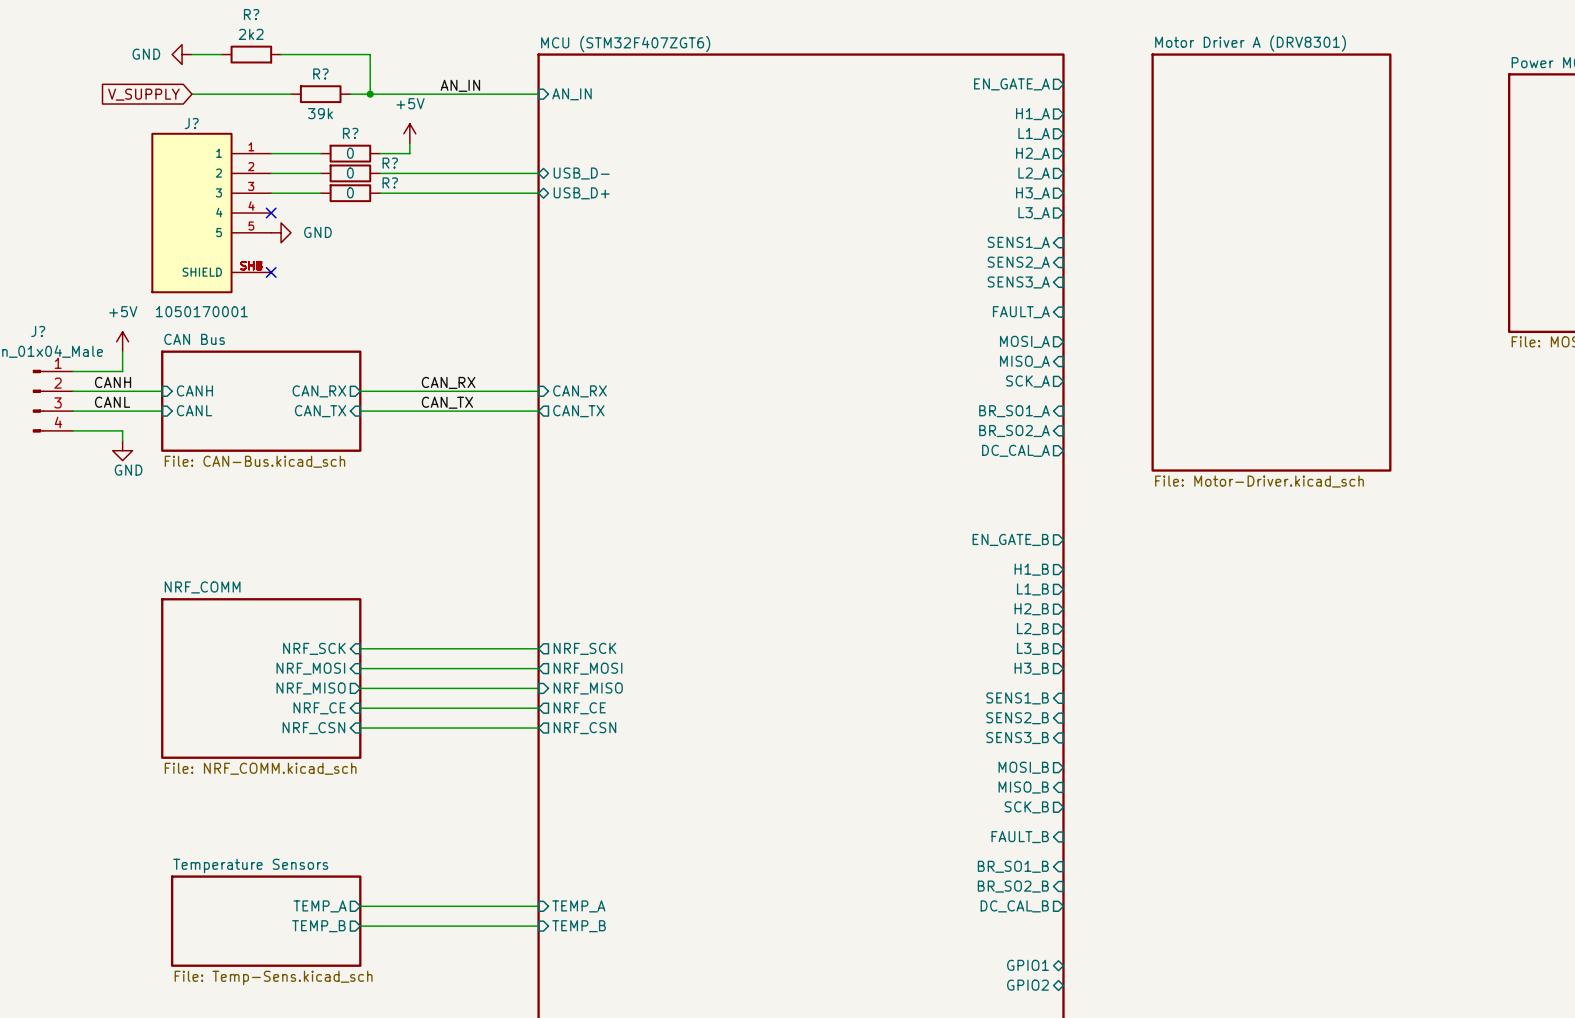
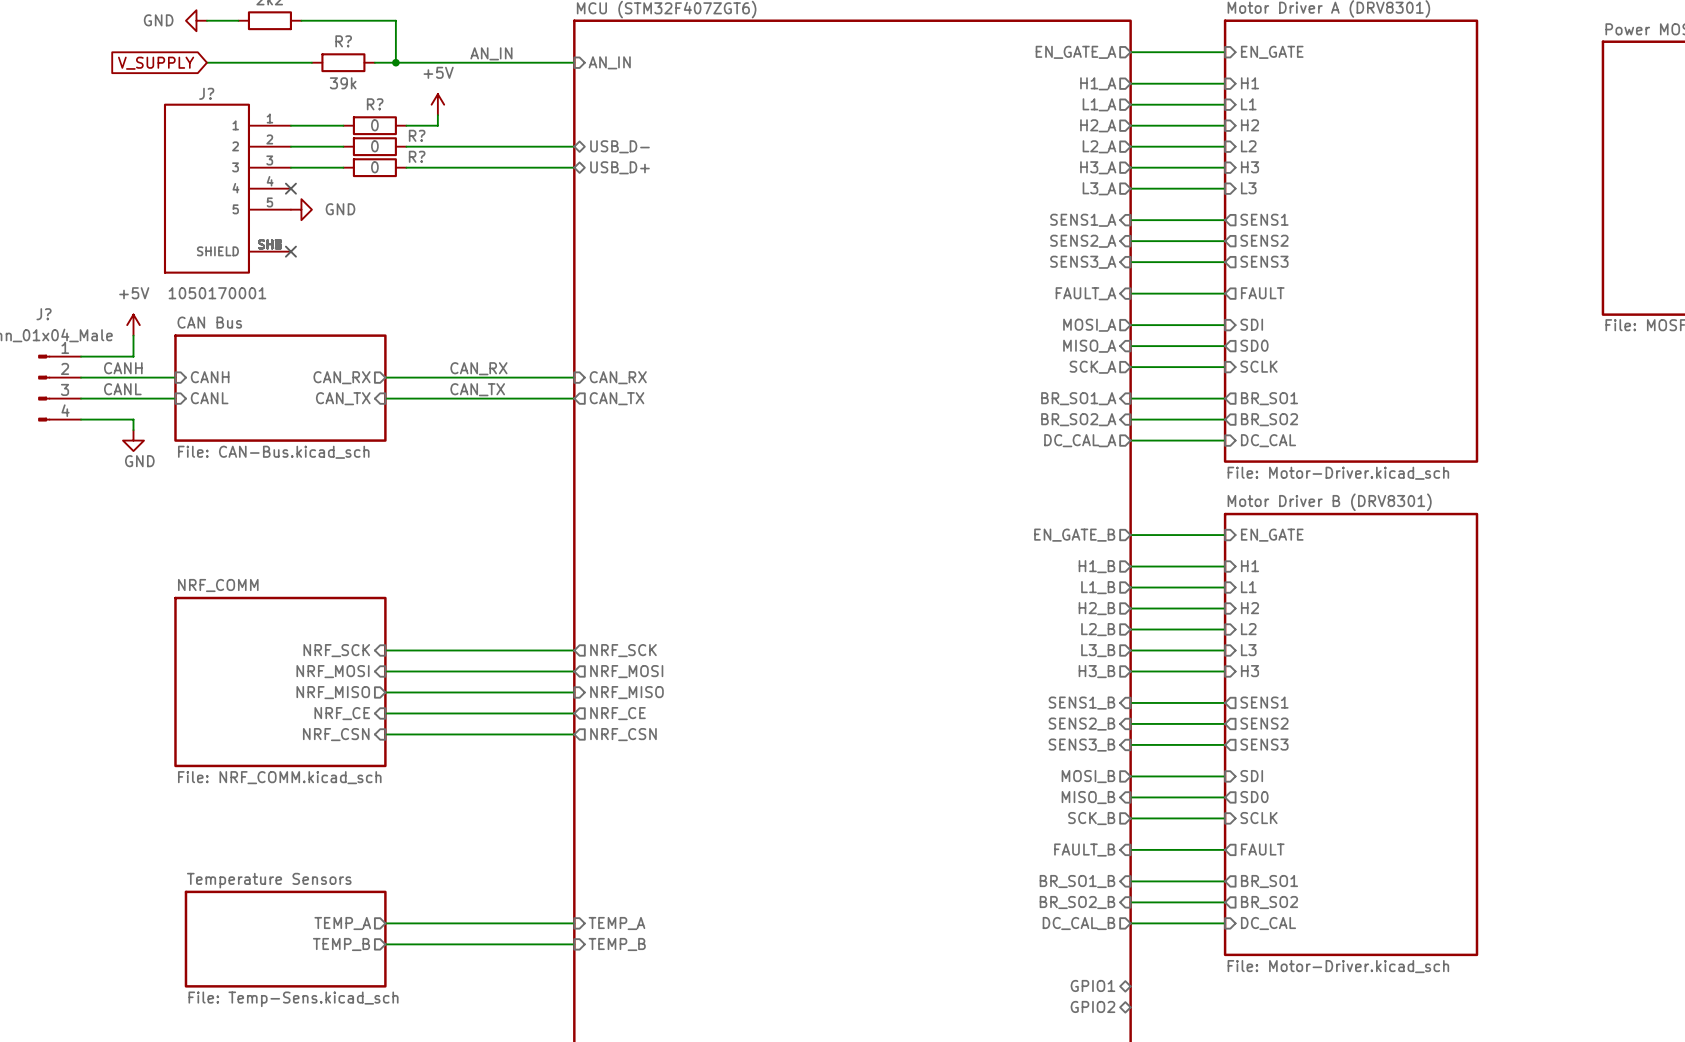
wire: none -> (1130, 52) (1225, 52)
sheet pin: none -> EN_GATE (1272, 52)
wire: none -> (1130, 83) (1225, 83)
sheet pin: none -> H1 (1249, 83)
wire: none -> (1130, 104) (1225, 104)
sheet pin: none -> L1 (1248, 104)
wire: none -> (1130, 125) (1225, 125)
sheet pin: none -> H2 (1249, 125)
wire: none -> (1130, 146) (1225, 146)
sheet pin: none -> L2 (1248, 146)
sheet pin: none -> H3 (1249, 167)
wire: none -> (1130, 167) (1225, 167)
sheet pin: none -> L3 (1248, 188)
wire: none -> (1130, 188) (1225, 188)
wire: none -> (1130, 220) (1225, 220)
sheet pin: none -> SENS1 (1264, 219)
wire: none -> (1130, 241) (1225, 241)
sheet pin: none -> SENS2 (1264, 240)
sheet pin: none -> SENS3 (1264, 261)
wire: none -> (1130, 262) (1225, 262)
sheet pin: none -> FAULT (1262, 293)
wire: none -> (1130, 293) (1225, 293)
wire: none -> (1130, 325) (1225, 325)
sheet pin: none -> SDI (1251, 324)
wire: none -> (1130, 346) (1225, 346)
sheet pin: none -> SD0 (1254, 345)
wire: none -> (1130, 367) (1225, 367)
sheet pin: none -> SCLK (1258, 366)
wire: none -> (1130, 398) (1225, 398)
sheet pin: none -> BR_SO1 (1269, 398)
wire: none -> (1130, 419) (1225, 419)
sheet pin: none -> BR_SO2 (1269, 419)
wire: none -> (1130, 440) (1225, 440)
sheet pin: none -> DC_CAL (1268, 440)
wire: none -> (1130, 535) (1225, 535)
sheet pin: none -> EN_GATE (1272, 535)
wire: none -> (1130, 566) (1225, 566)
sheet pin: none -> H1 (1249, 566)
wire: none -> (1130, 587) (1225, 587)
sheet pin: none -> L1 (1248, 587)
sheet pin: none -> H2 (1249, 608)
wire: none -> (1130, 608) (1225, 608)
wire: none -> (1130, 629) (1225, 629)
sheet pin: none -> L2 (1248, 629)
wire: none -> (1130, 650) (1225, 650)
sheet pin: none -> L3 (1248, 650)
wire: none -> (1130, 671) (1225, 671)
sheet pin: none -> H3 (1249, 671)
sheet pin: none -> SENS1 (1264, 702)
wire: none -> (1130, 702) (1225, 702)
sheet pin: none -> SENS2 (1264, 723)
wire: none -> (1130, 723) (1225, 723)
sheet Motor Driver B (DRV8301): none -> File: Motor-Driver.kicad_sch (1351, 734)
wire: none -> (1130, 744) (1225, 744)
sheet pin: none -> SENS3 (1264, 744)
wire: none -> (1130, 776) (1225, 776)
sheet pin: none -> SDI (1251, 776)
wire: none -> (1130, 797) (1225, 797)
sheet pin: none -> SD0 (1254, 797)
sheet pin: none -> SCLK (1258, 818)
wire: none -> (1130, 818) (1225, 818)
wire: none -> (1130, 849) (1225, 849)
sheet pin: none -> FAULT (1262, 849)
wire: none -> (1130, 881) (1225, 881)
sheet pin: none -> BR_SO1 (1269, 881)
wire: none -> (1130, 902) (1225, 902)
sheet pin: none -> BR_SO2 (1269, 902)
wire: none -> (1130, 923) (1225, 923)
sheet pin: none -> DC_CAL (1268, 923)

